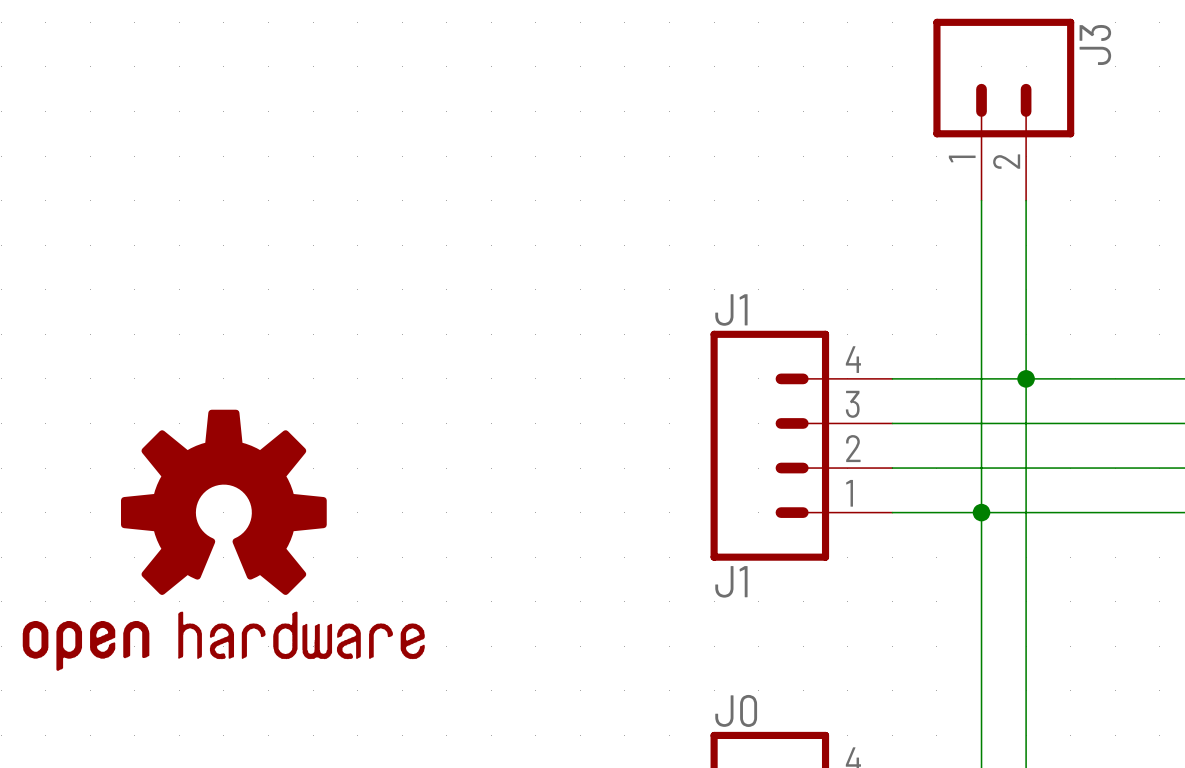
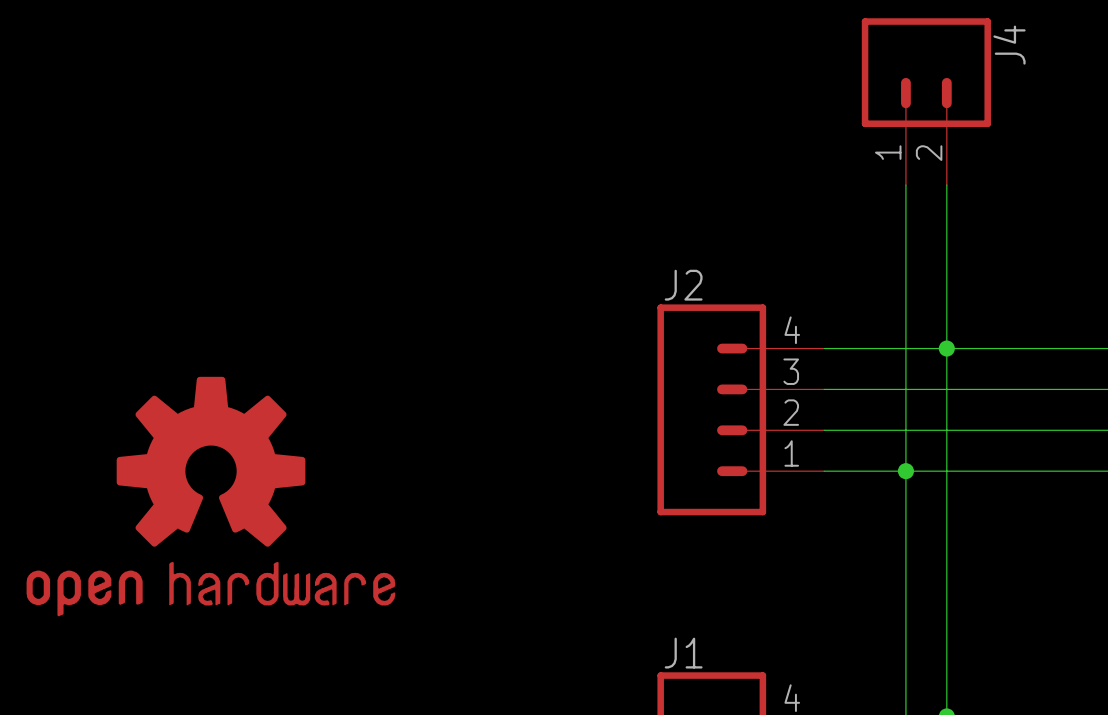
J3 name: J3 (1095, 44) -> J4 (1009, 45)
J1 name: J1 (731, 309) -> J2 (683, 285)
J1 value: J1 (731, 581) -> none
J0 name: J0 (736, 710) -> J1 (683, 653)

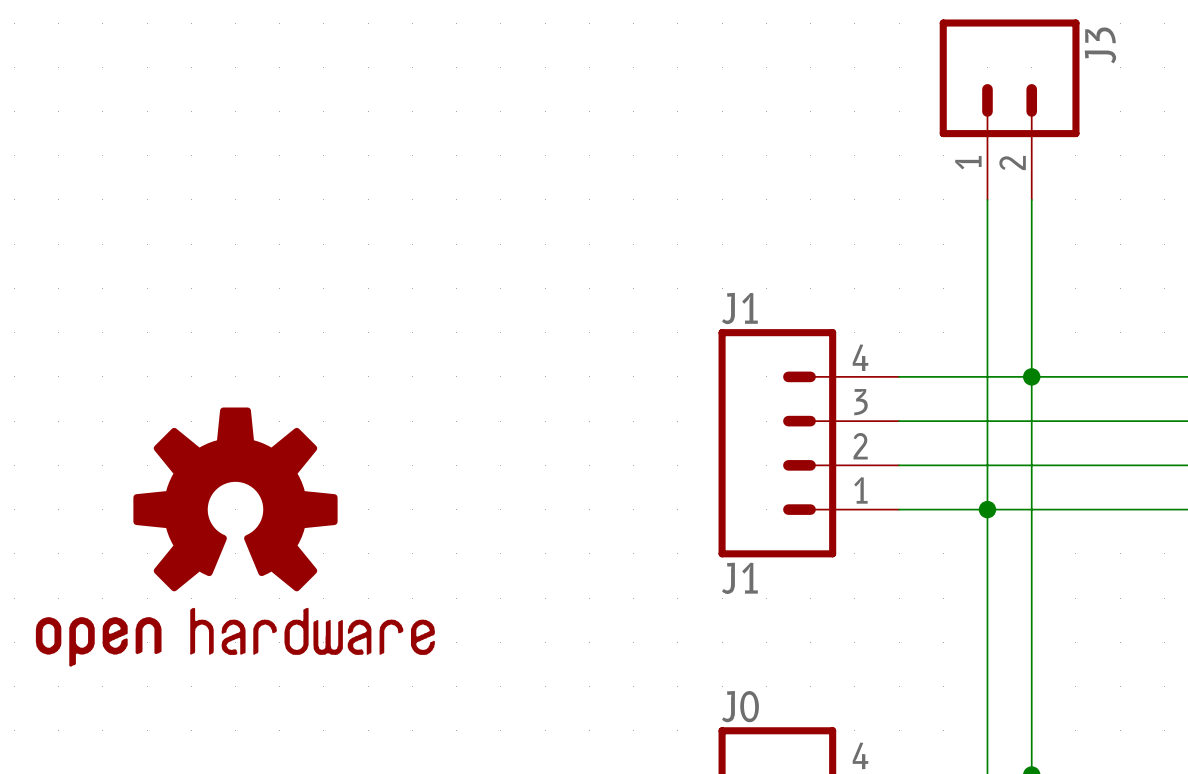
J4 name: J4 (1009, 45) -> J3 (1100, 45)
J2 name: J2 (683, 285) -> J1 (739, 308)
J2 value: none -> J1 (739, 578)
J1 name: J1 (683, 653) -> J0 (740, 706)

